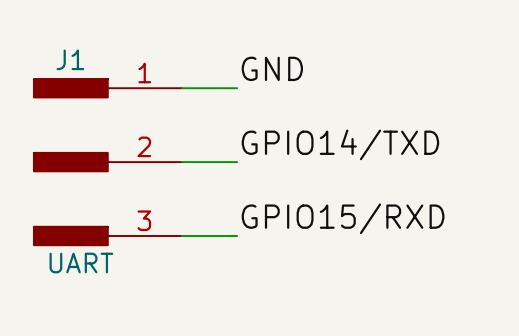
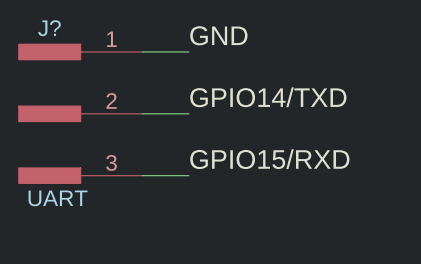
J1 name: J1 (70, 59) -> J? (49, 28)

